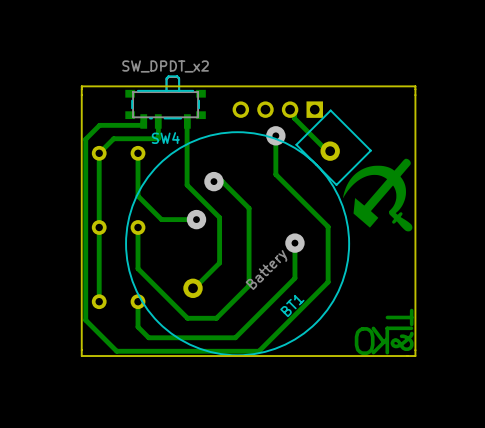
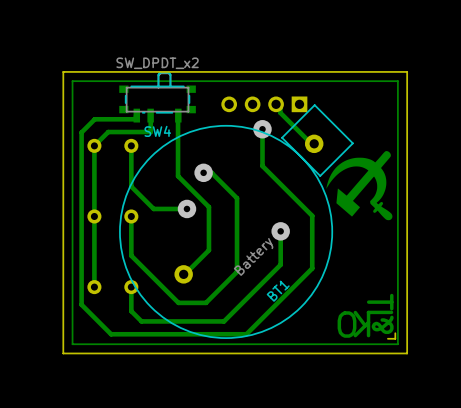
board edge: none -> (407, 71) (63, 71) (63, 353) (407, 353) (407, 71)
track: none -> (397, 81) (72, 81) (72, 344) (397, 344) (397, 81)
board edge: (415, 350) (415, 86) (81, 86) (81, 356) (407, 356) -> none

